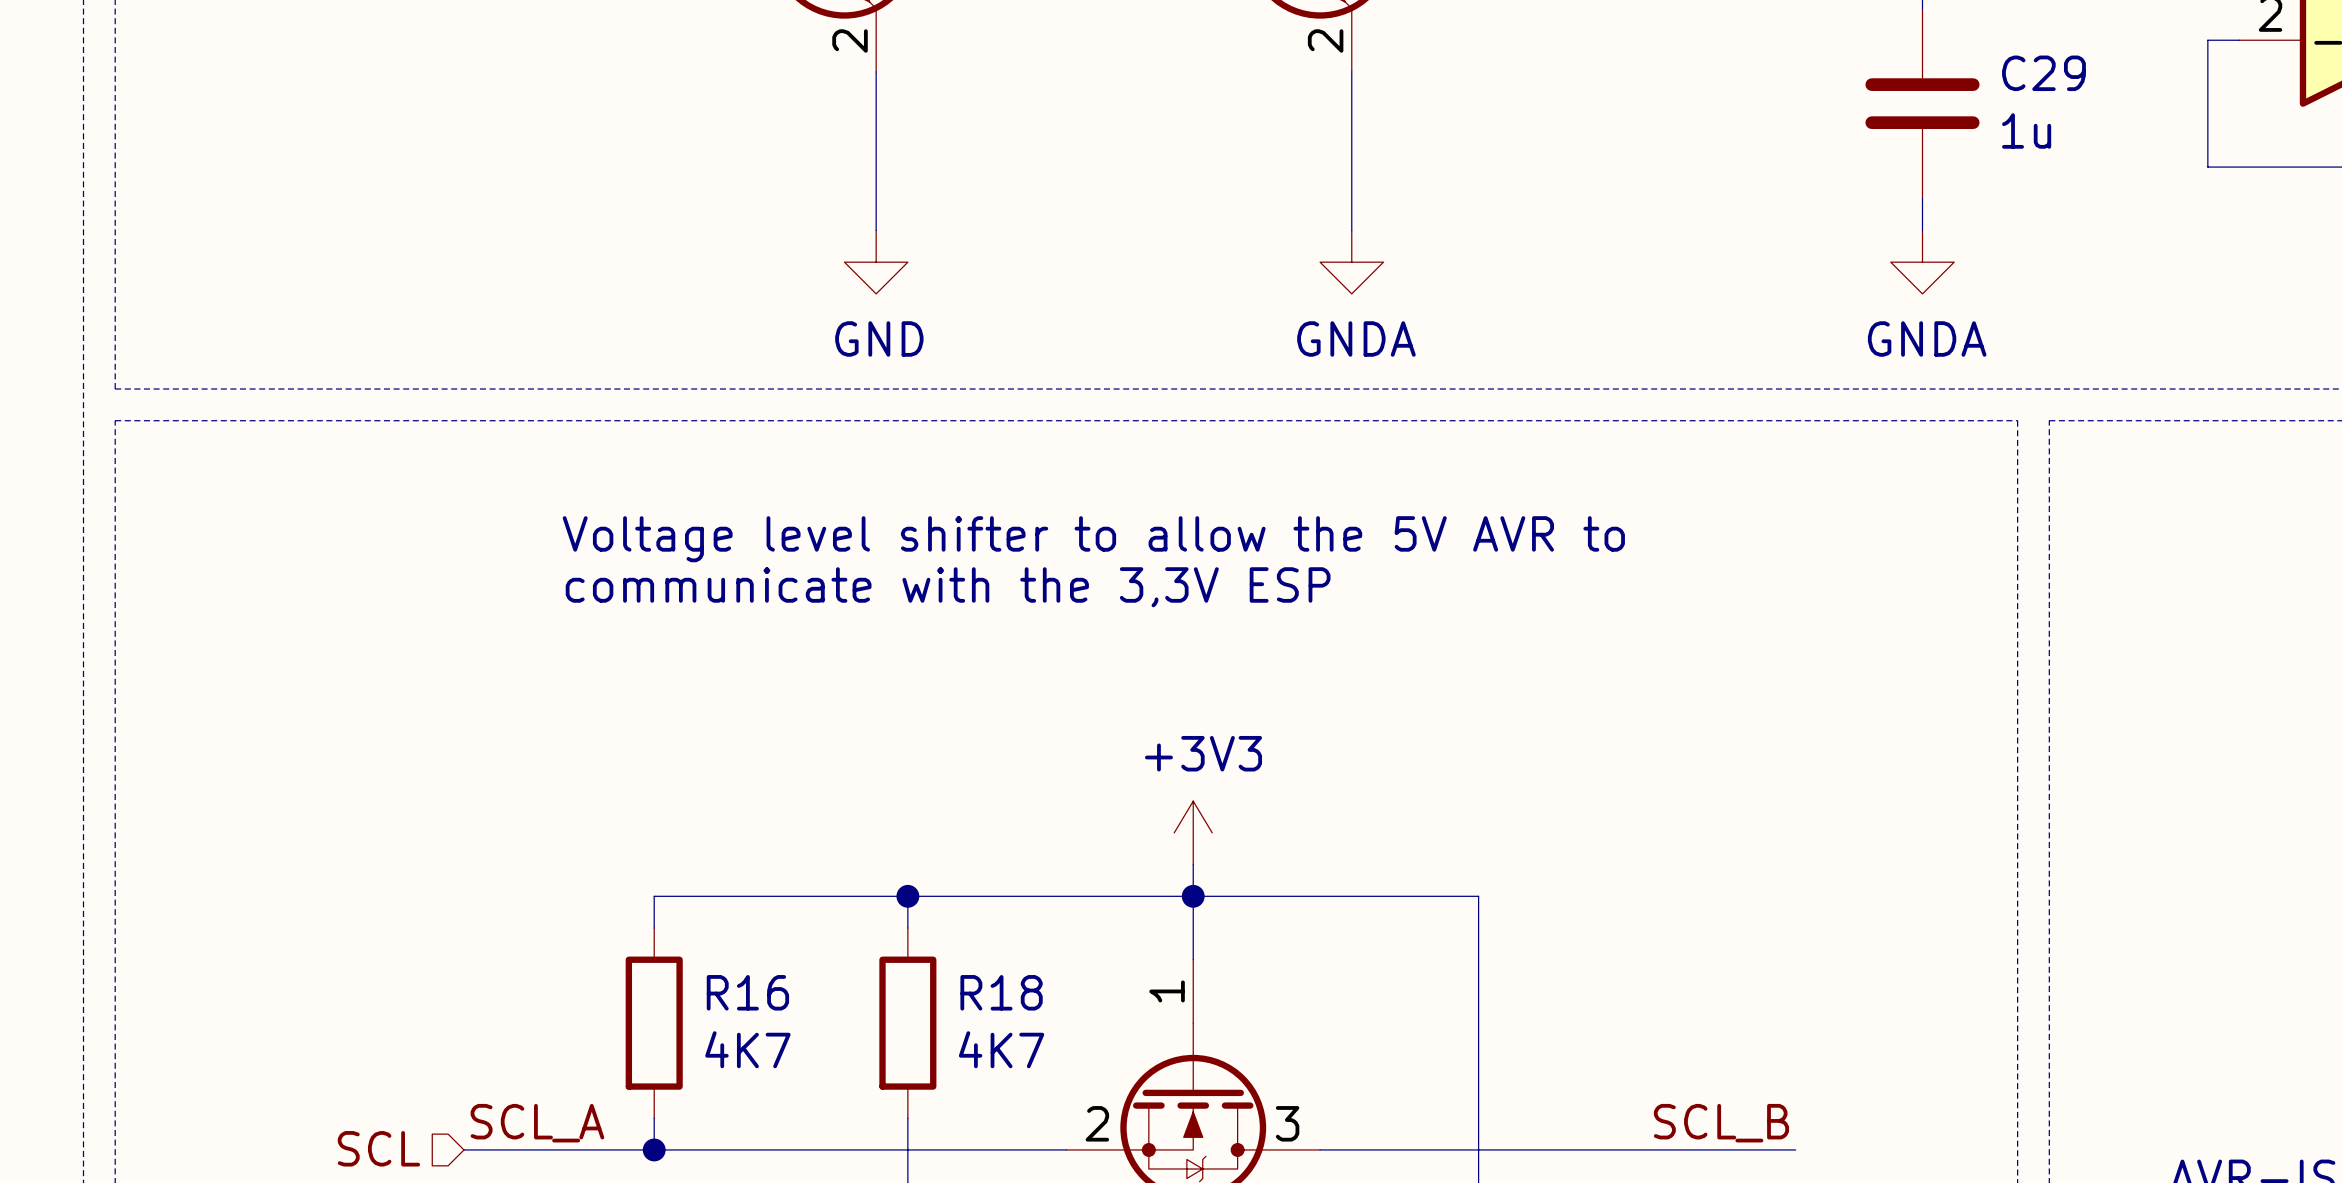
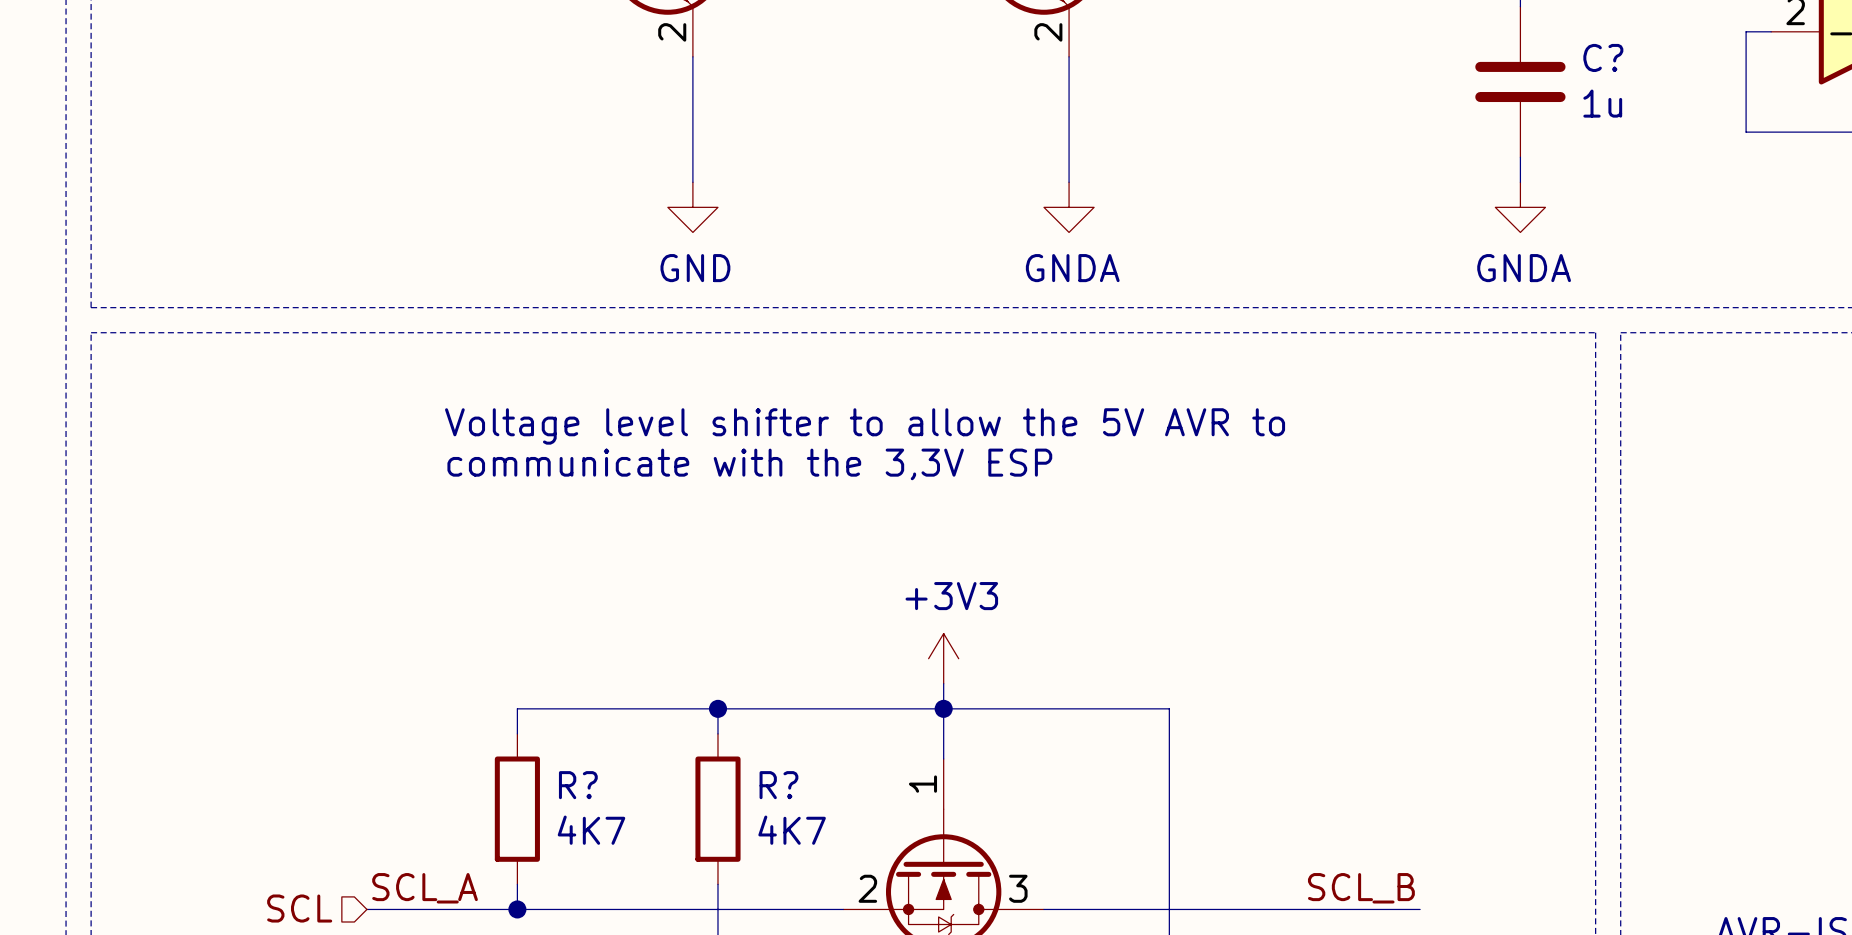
C29 name: C29 (2043, 73) -> C? (1603, 57)
R16 name: R16 (747, 992) -> R? (578, 785)
R18 name: R18 (1001, 992) -> R? (778, 785)

